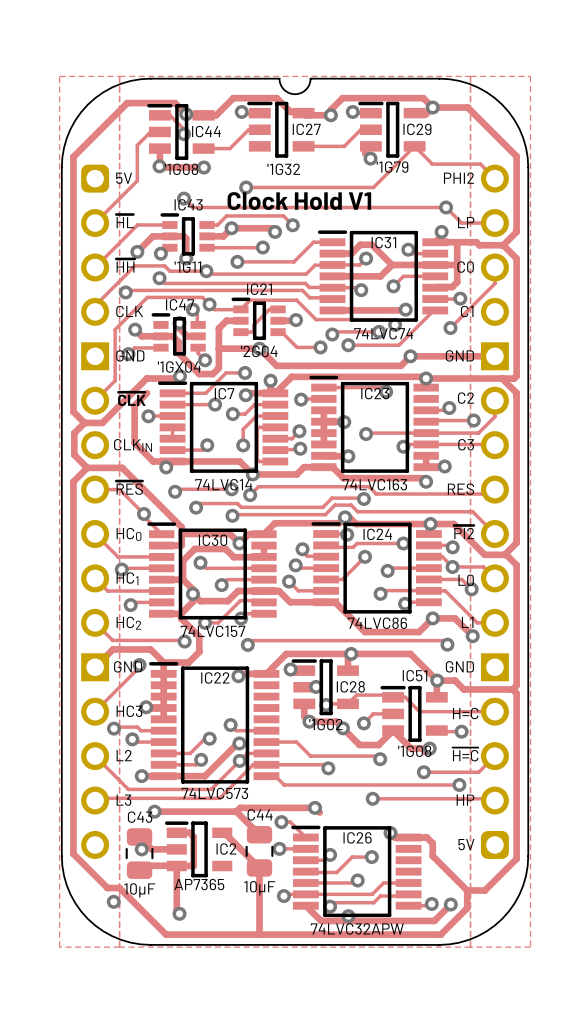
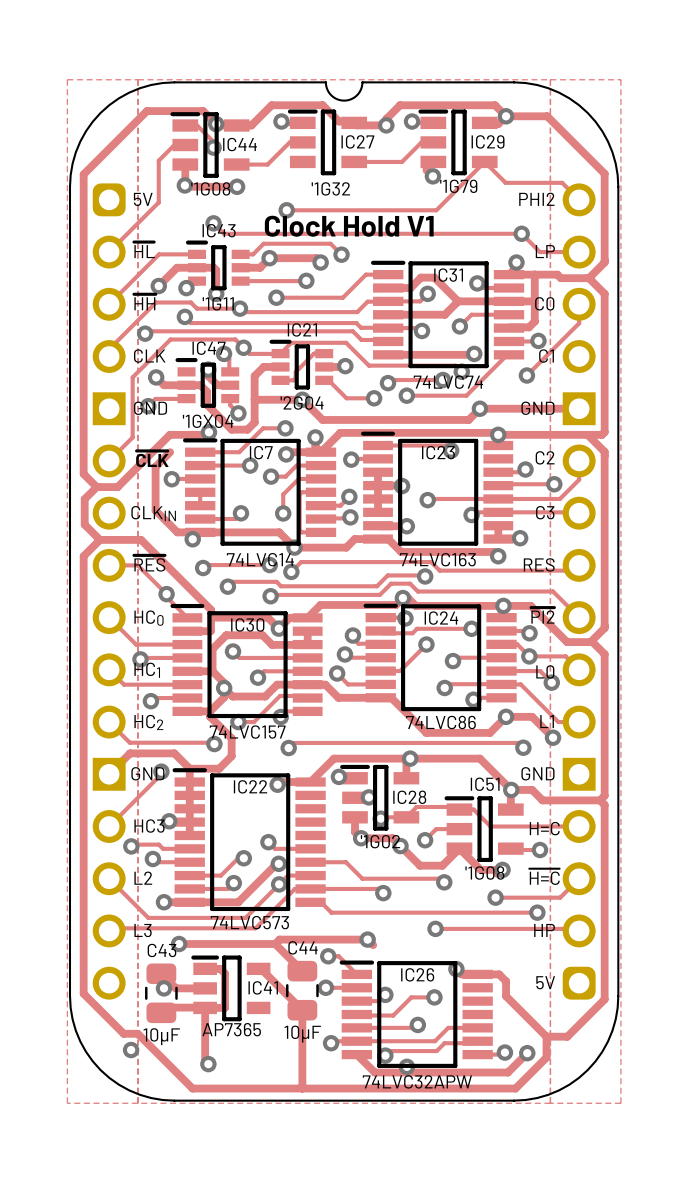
IC2 name: IC2 (226, 849) -> IC41 (263, 987)

